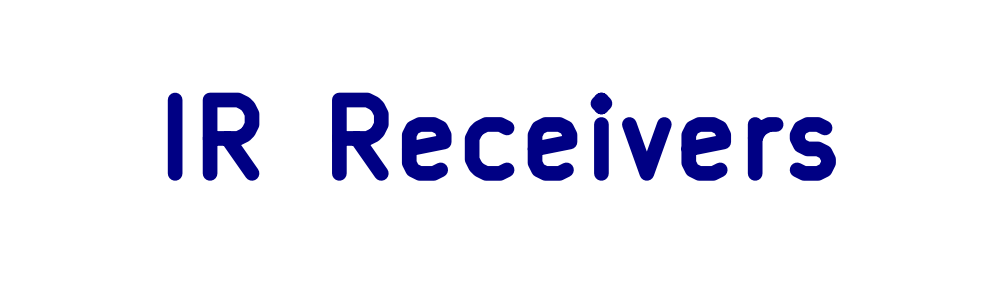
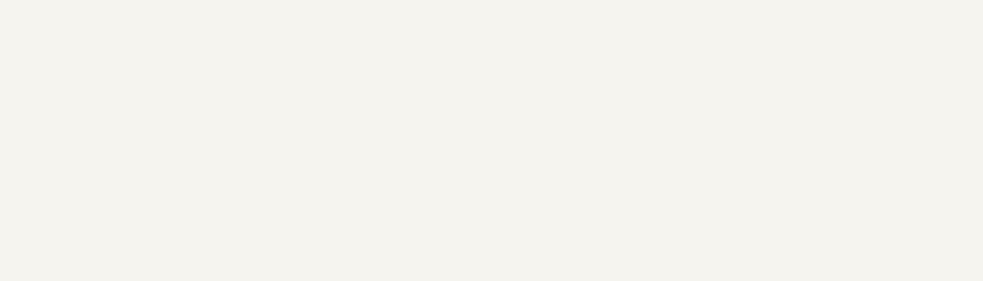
text: IR Receivers (501, 136) -> none

